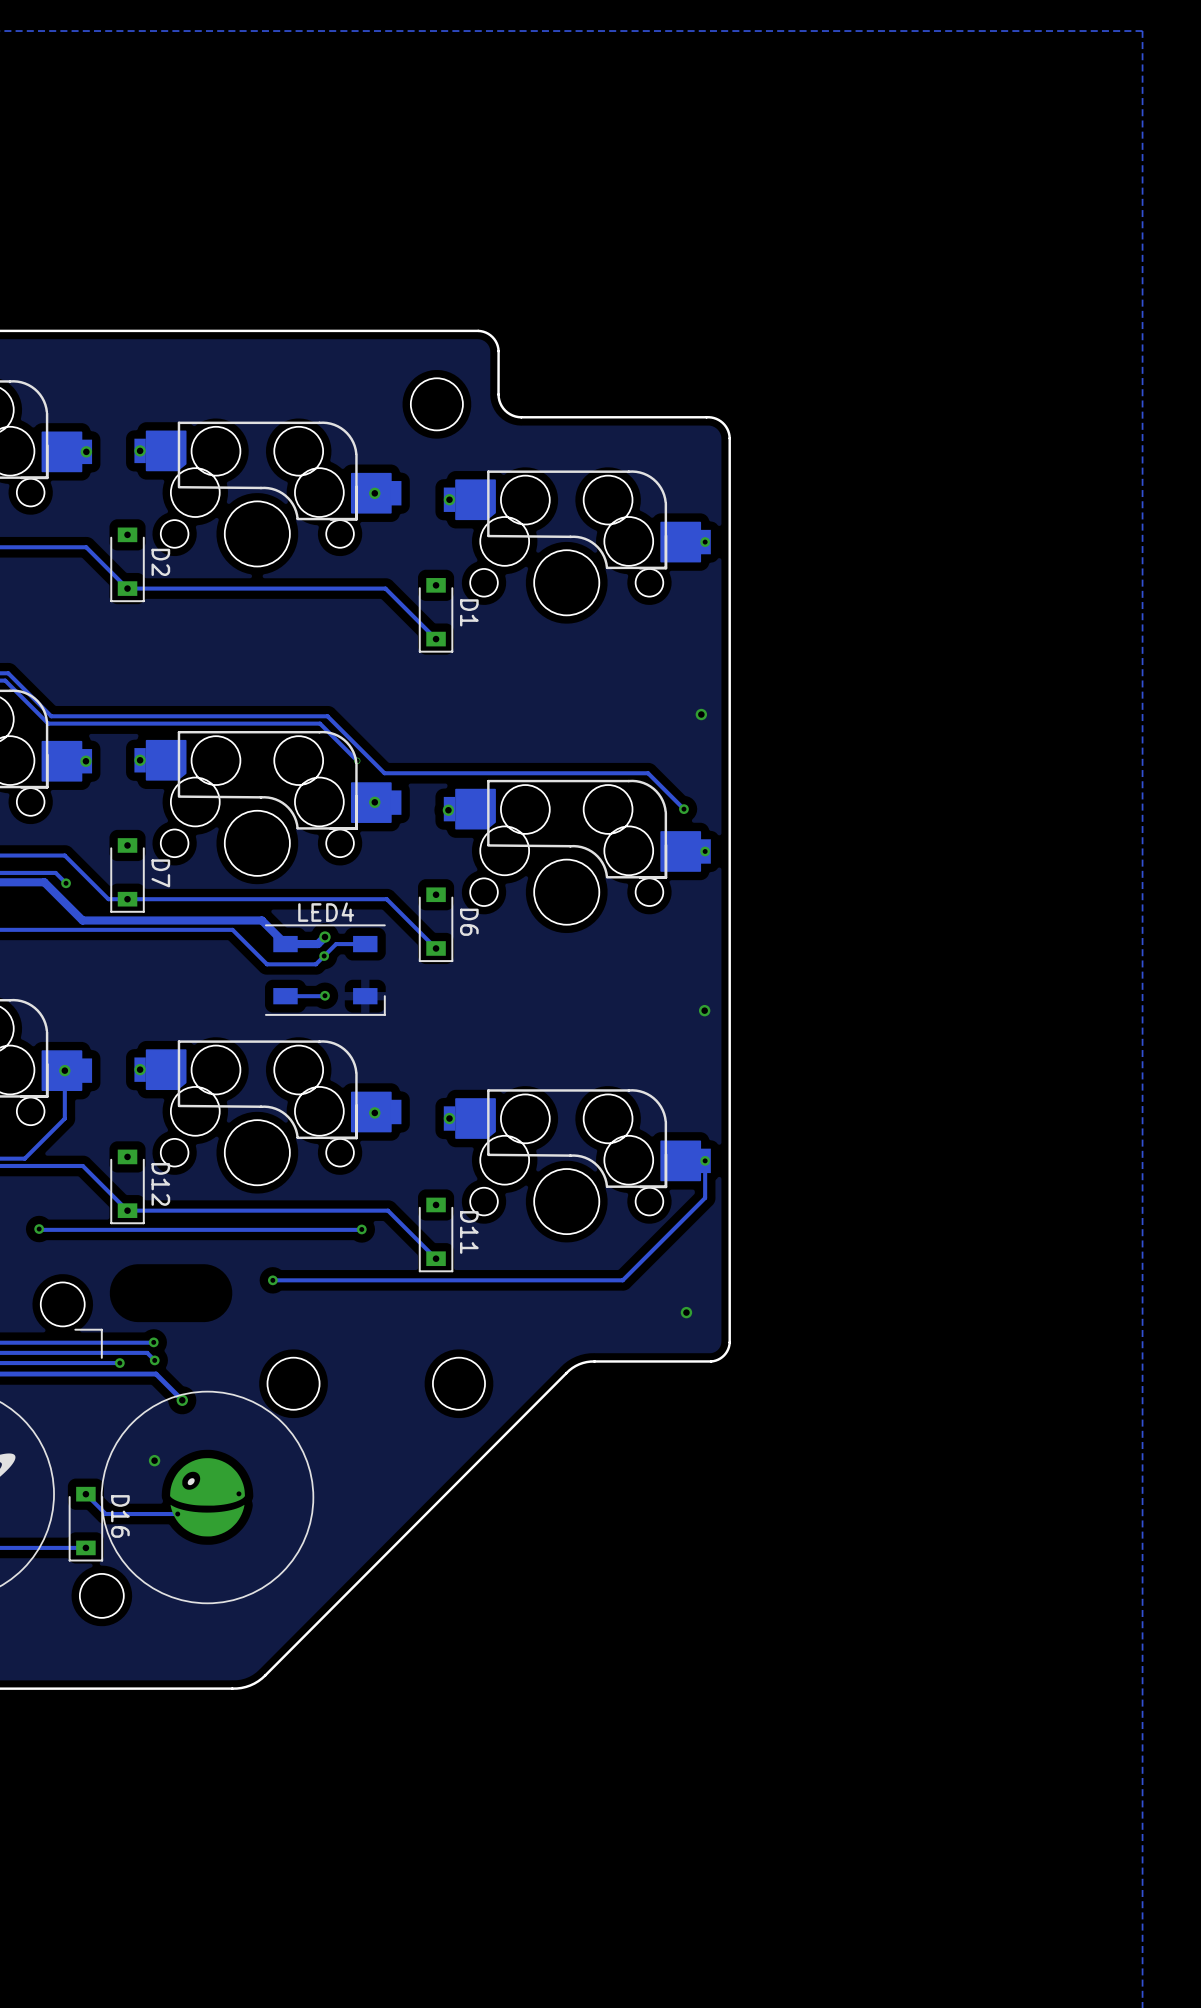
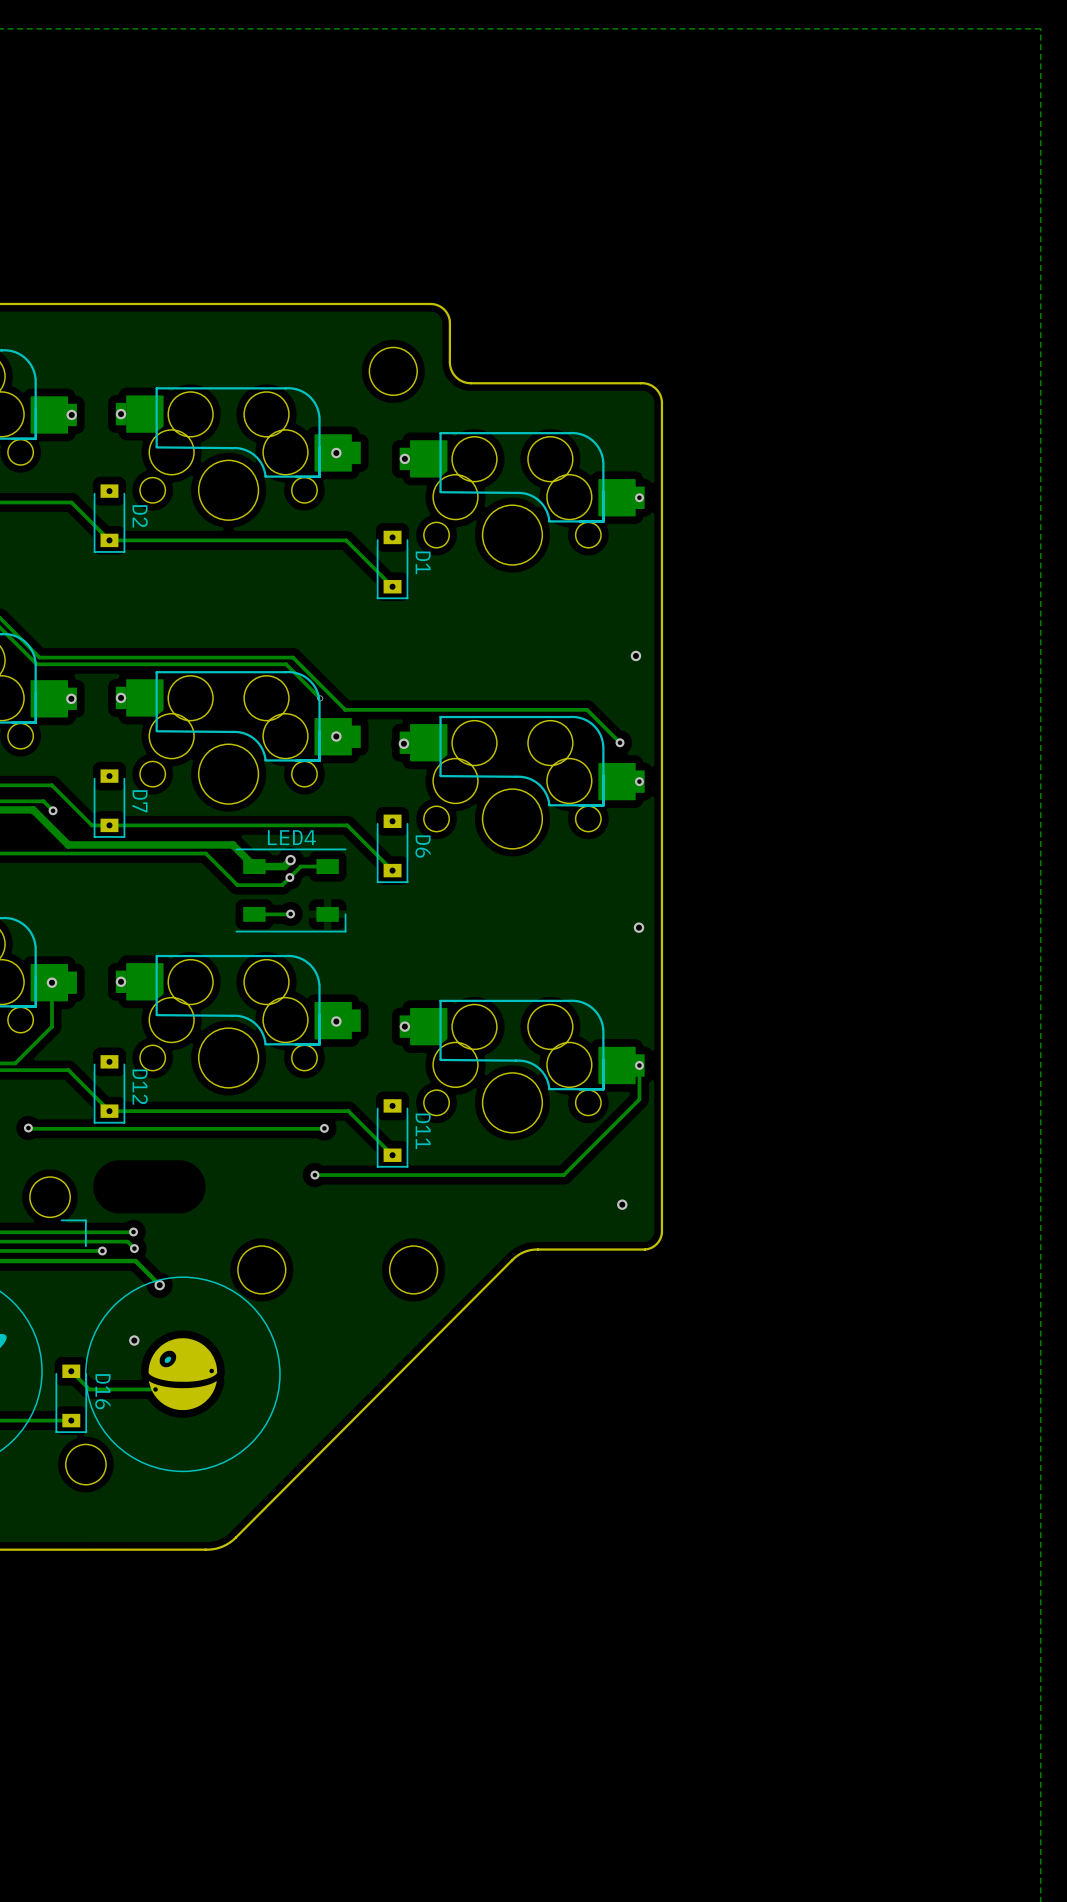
via position: (272, 1280) -> (314, 1175)
track: (351, 1280) (272, 1280) -> none

